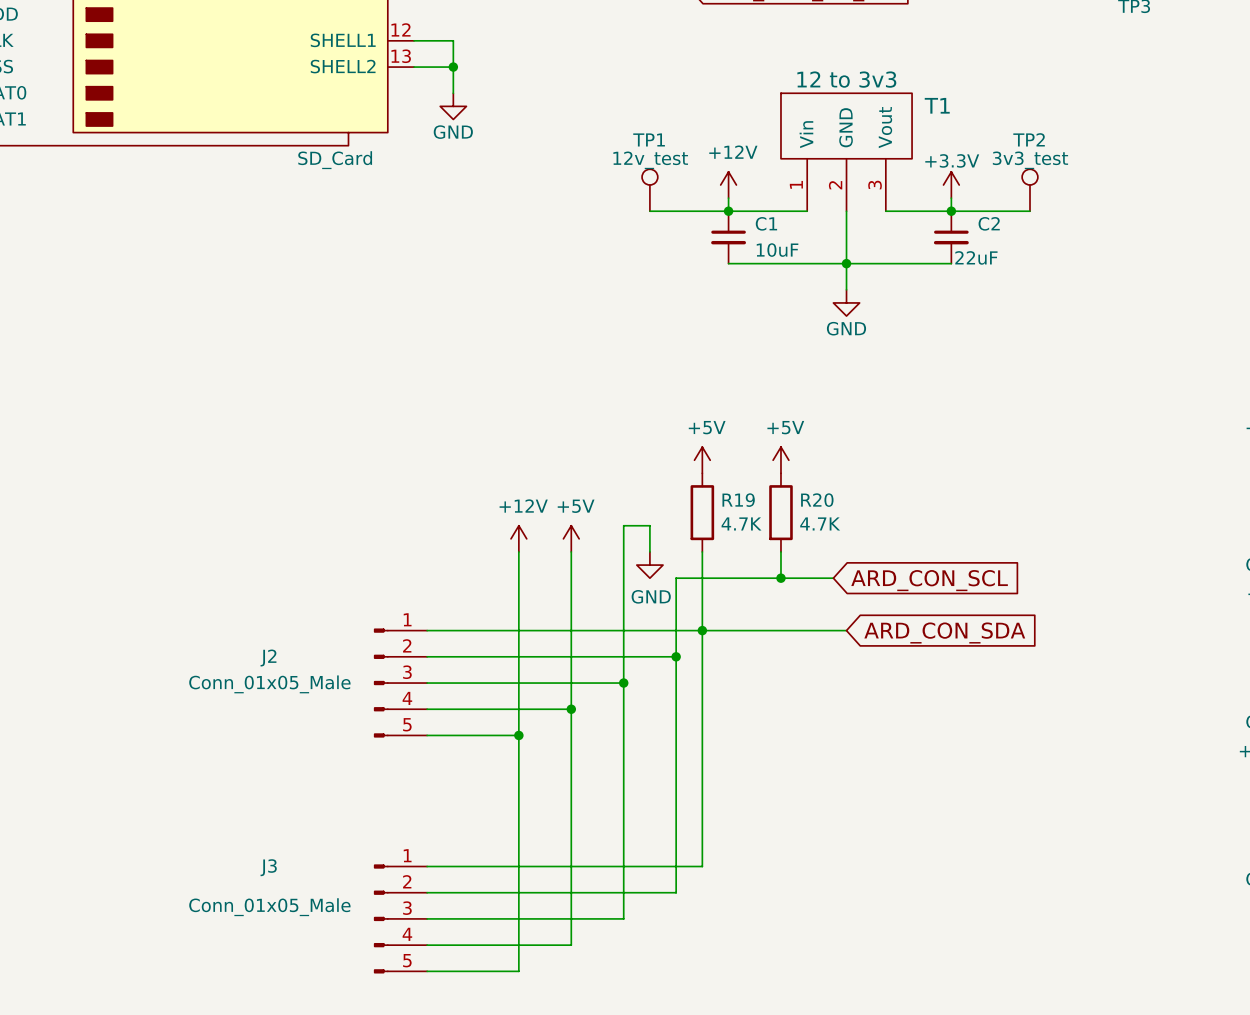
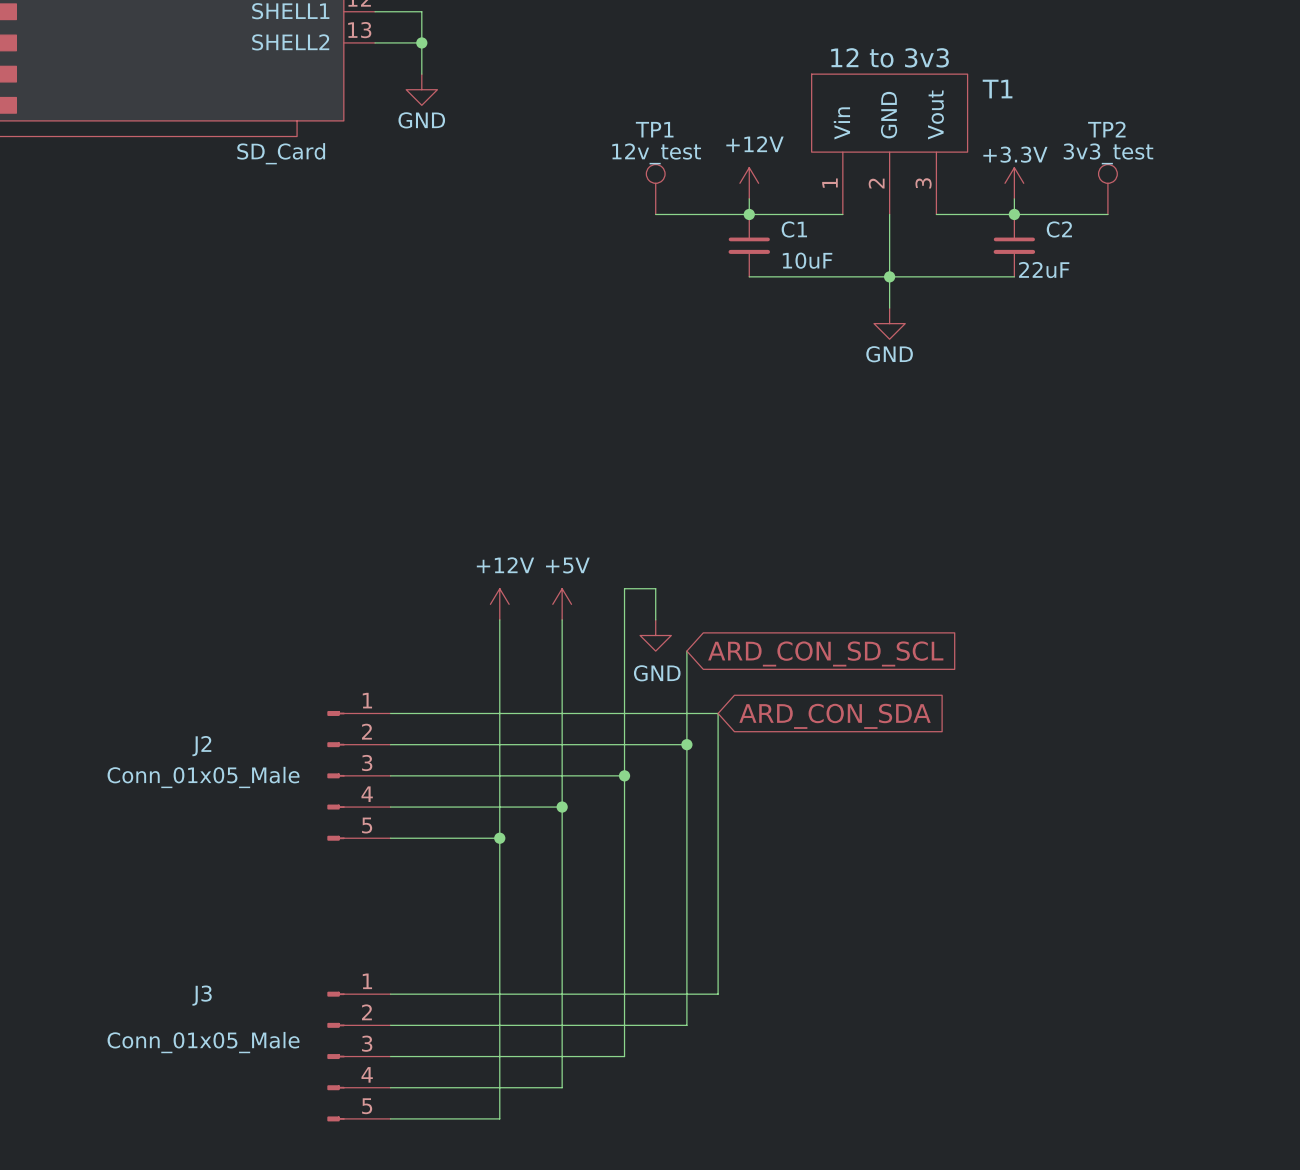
power symbol: +5V (702, 460) -> none
power symbol: +5V (780, 460) -> none
R19: 4.7K (702, 512) -> none
R20: 4.7K (780, 512) -> none
wire: (702, 551) (702, 630) (846, 630) -> none
wire: (780, 551) (780, 578) -> none
wire: (676, 578) (833, 578) -> none
junction: (780, 578) -> none
global label: ARD_CON_SCL (929, 580) -> ARD_CON_SD_SCL (825, 653)
junction: (702, 630) -> none
global label position: ARD_CON_SDA (944, 633) -> ARD_CON_SDA (835, 716)

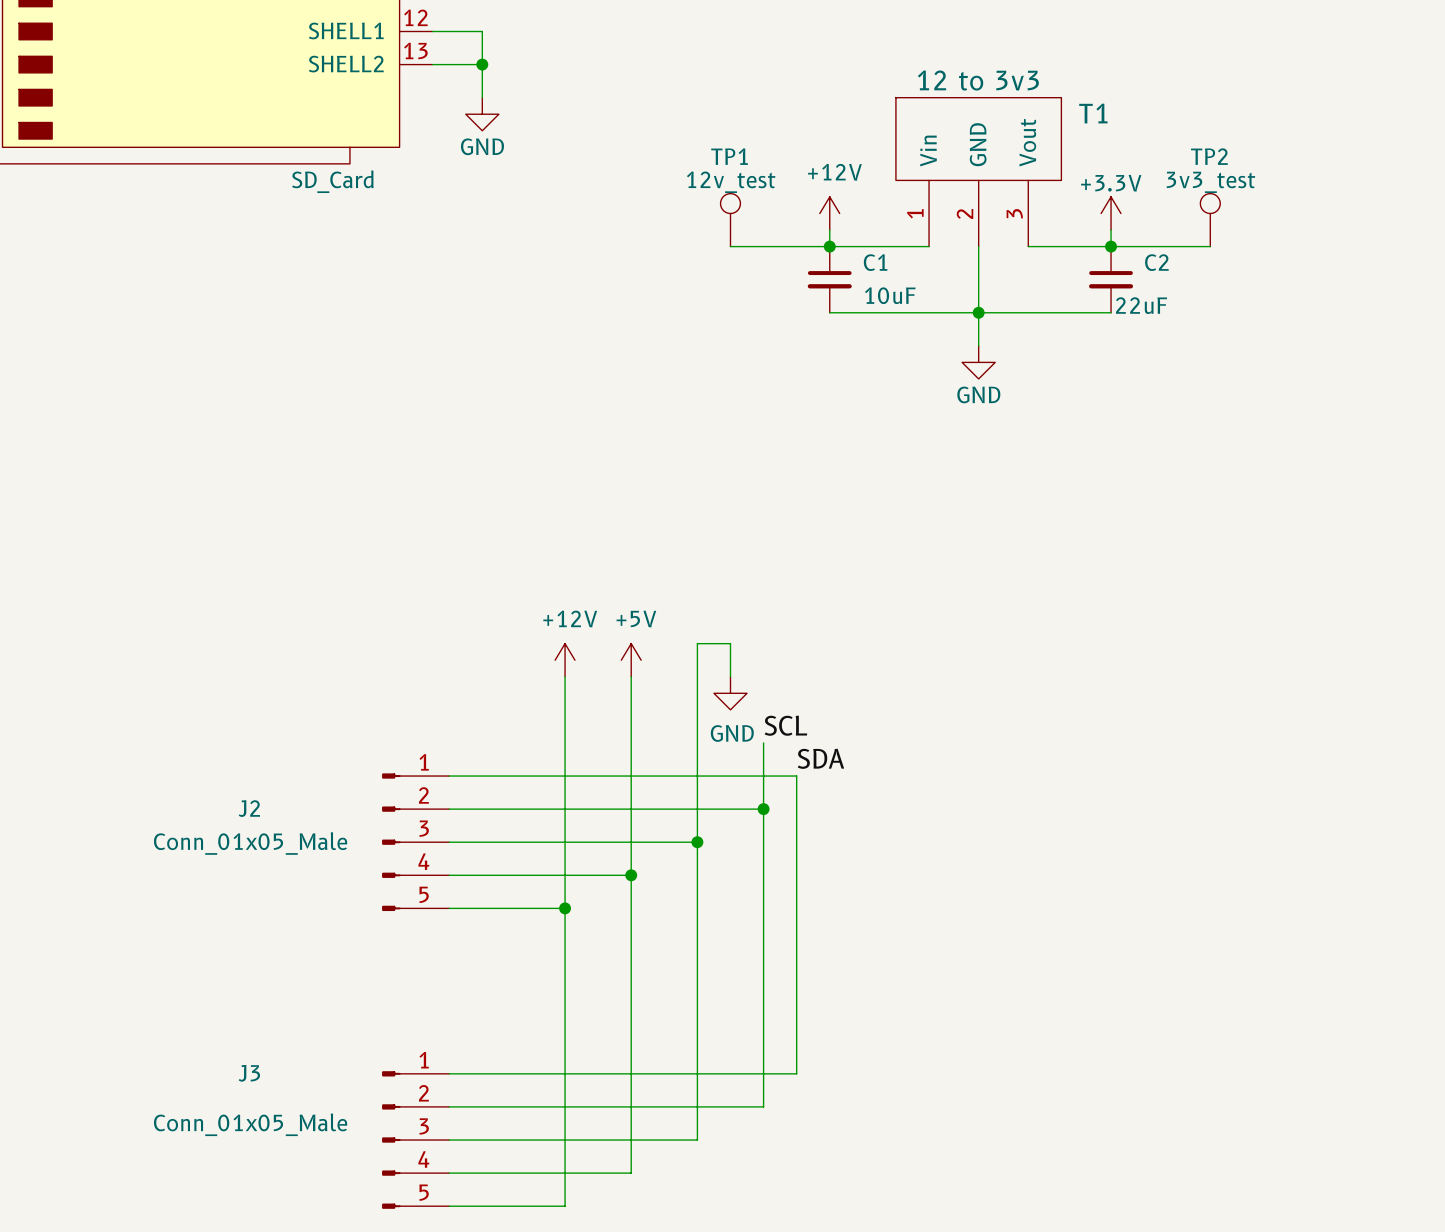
wire: (686, 651) (686, 682) -> none
global label: ARD_CON_SD_SCL (825, 653) -> none
label: none -> SCL (785, 725)
label: none -> SDA (820, 758)
global label: ARD_CON_SDA (835, 716) -> none

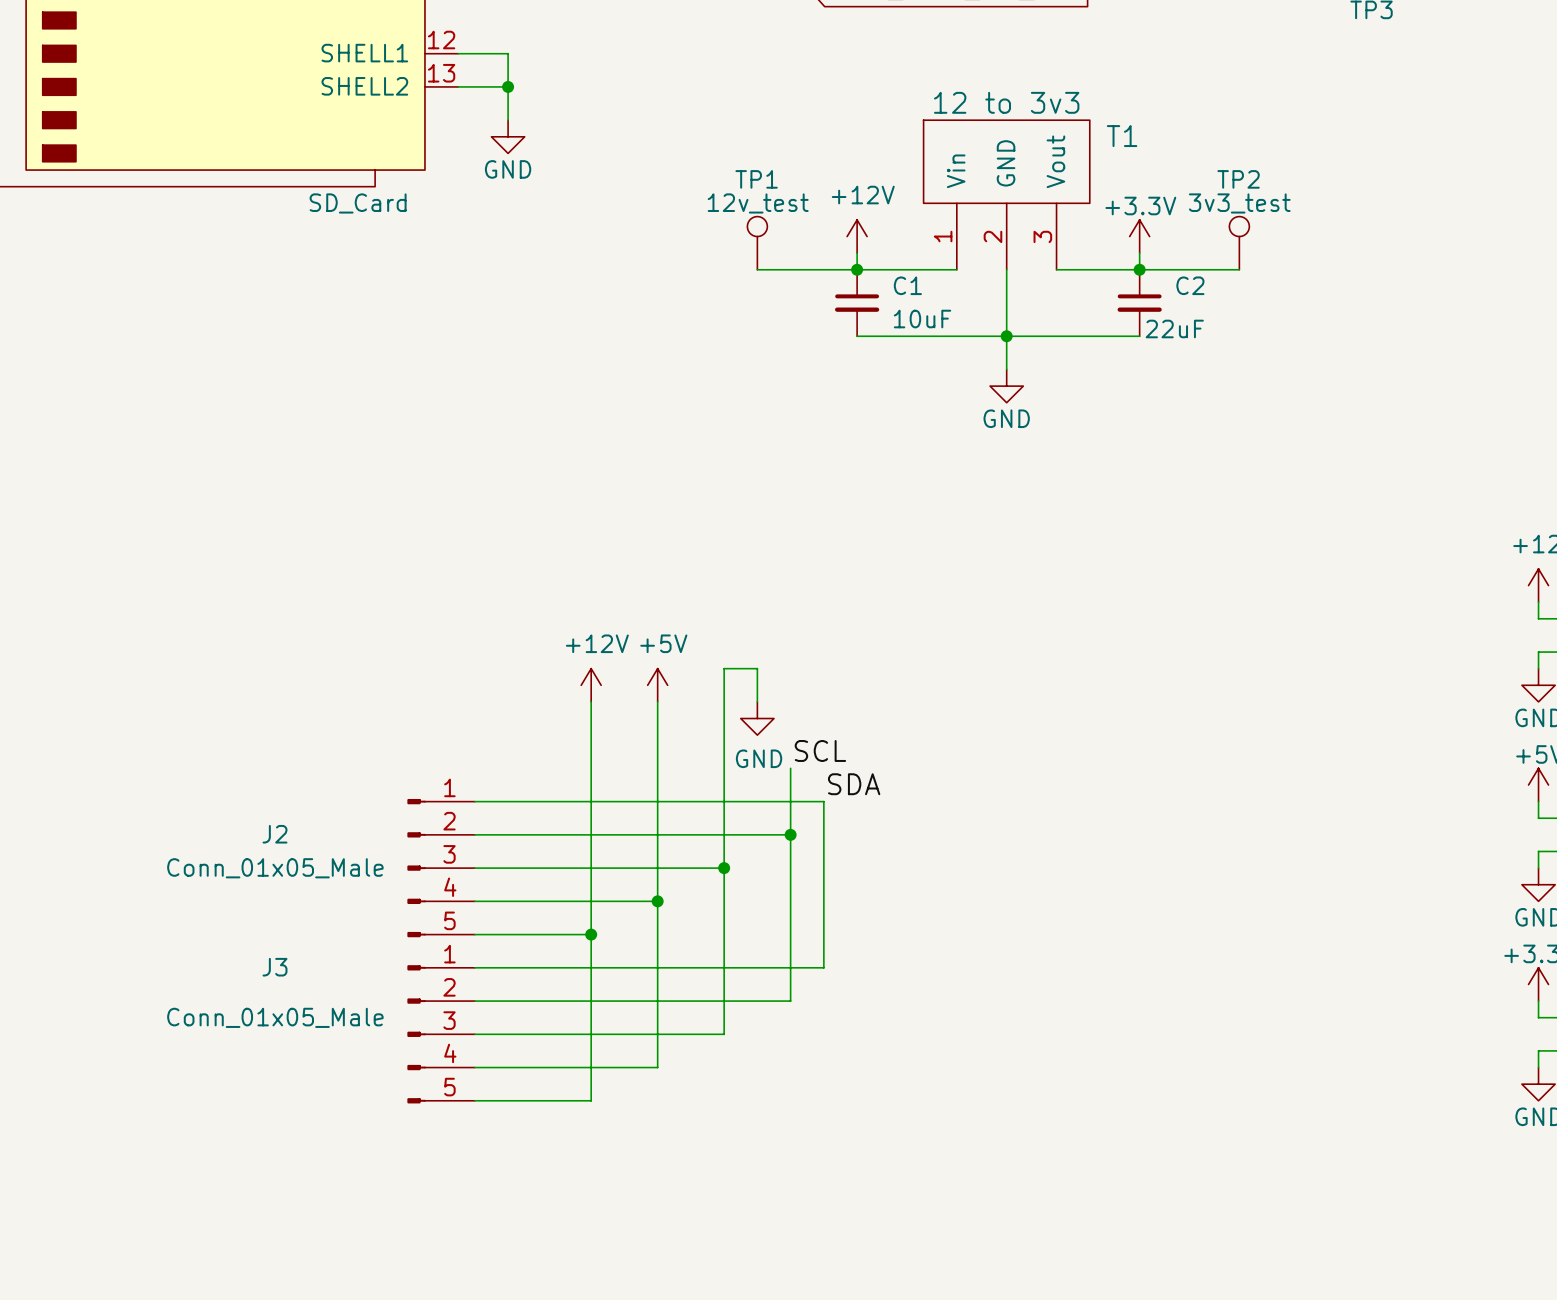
wire: (796, 941) (796, 1073) (565, 1073) (565, 1206) (449, 1206) -> (823, 967) (474, 967)
wire: (763, 974) (763, 1106) (449, 1106) -> (790, 1001) (474, 1001)
wire: (697, 1007) (697, 1140) (449, 1140) -> (724, 1034) (474, 1034)
wire: (631, 1040) (631, 1173) (449, 1173) -> (657, 1067) (474, 1067)
J3 position: (415, 1140) -> (441, 1034)

